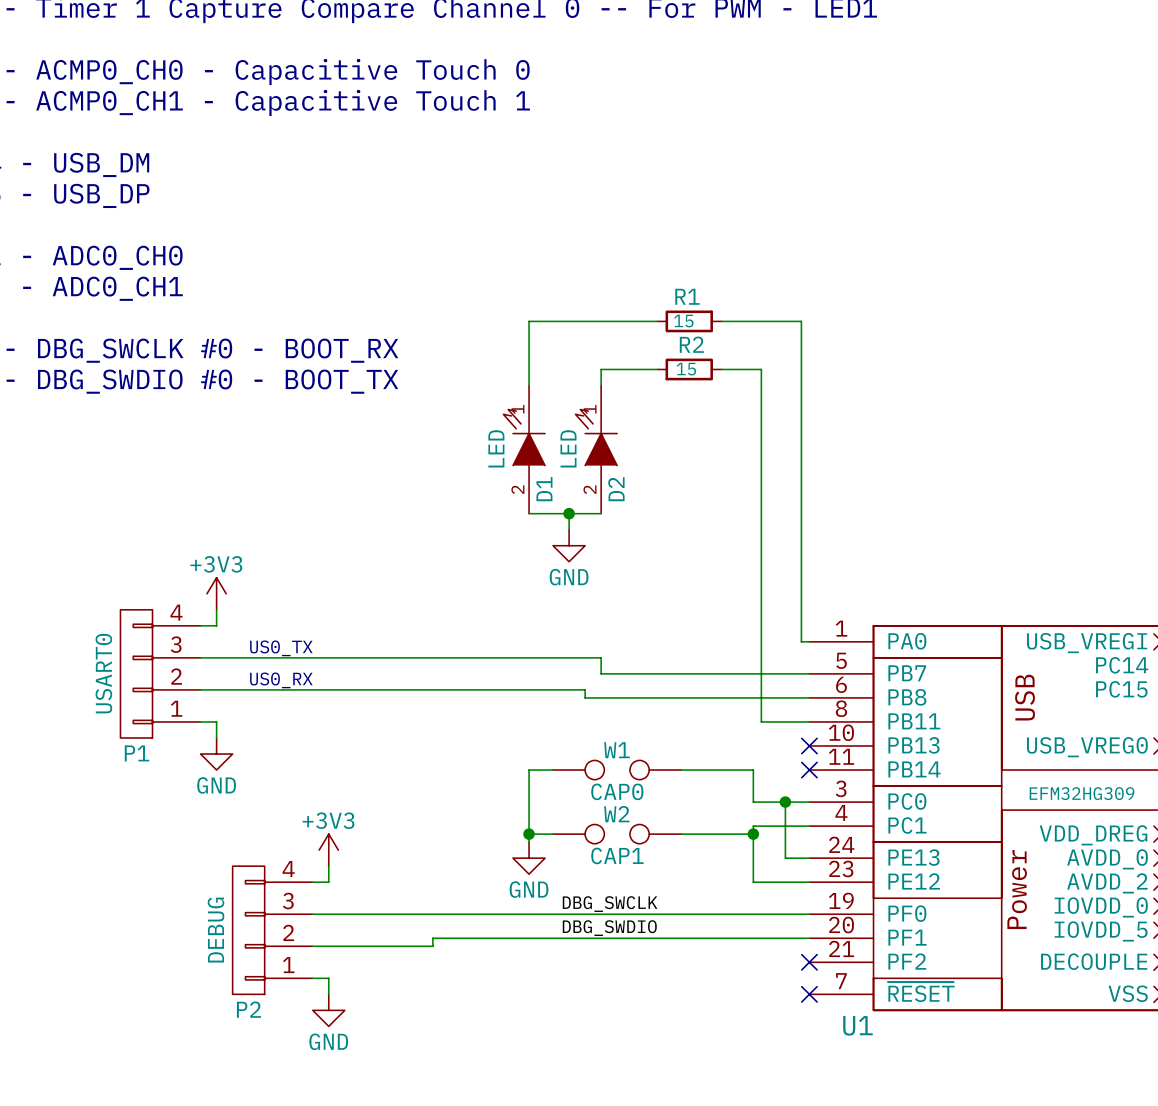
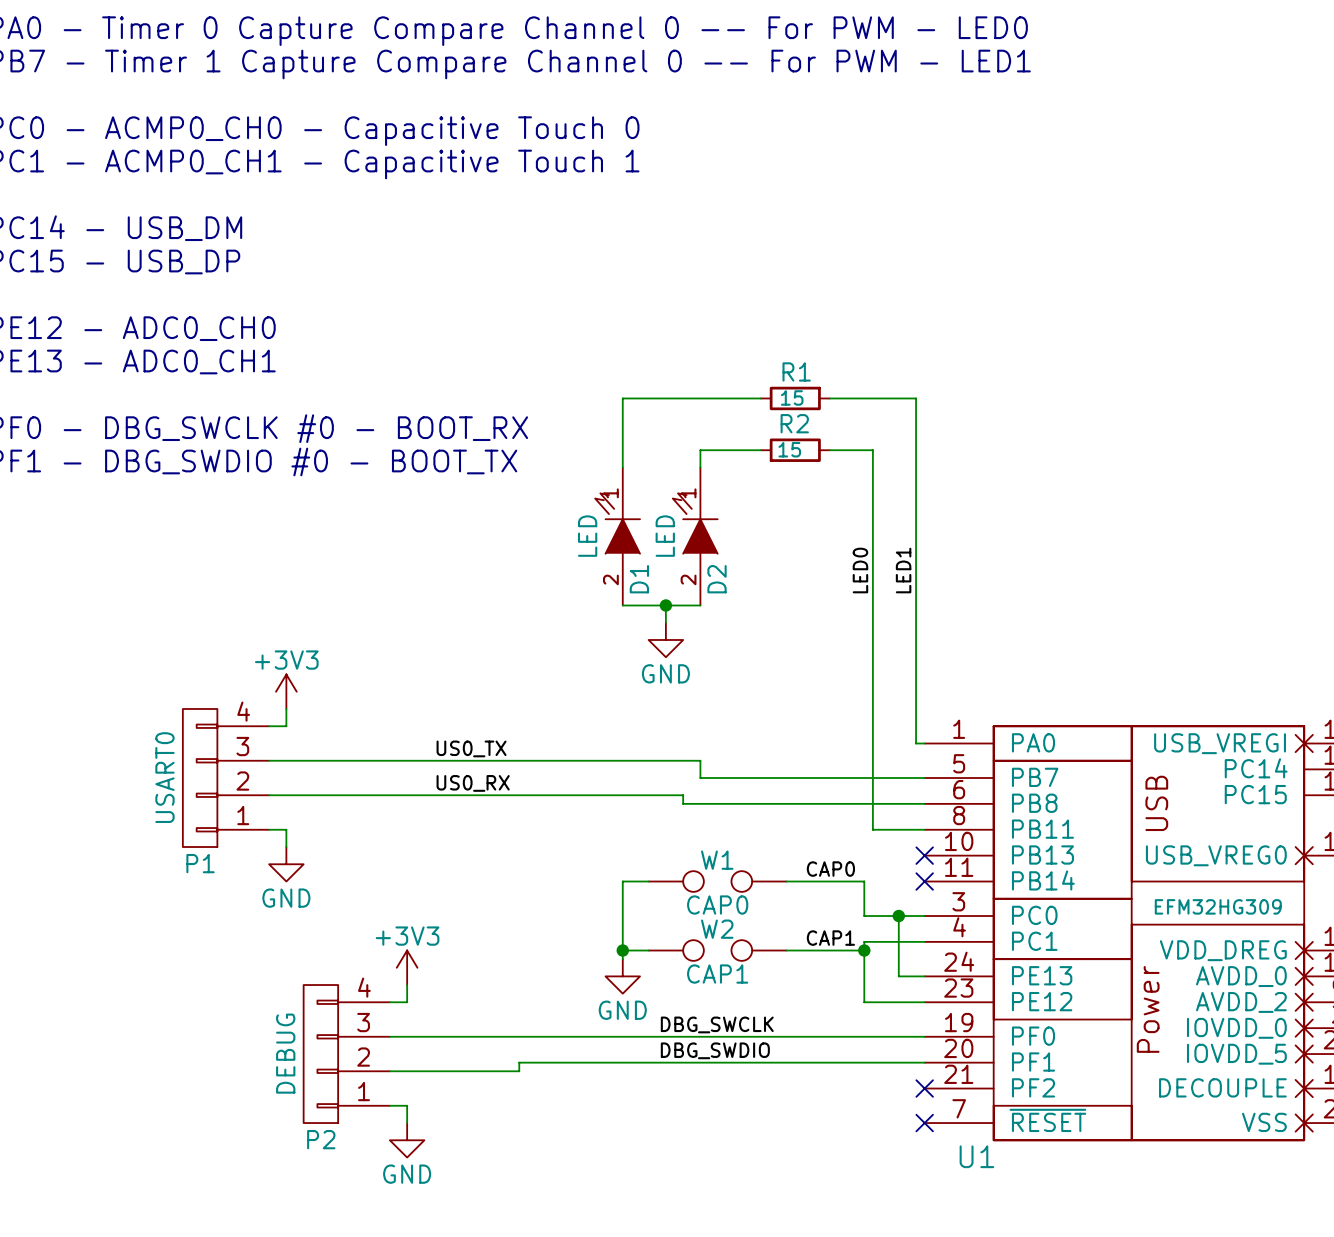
label: none -> LED0 (860, 570)
label: none -> LED1 (903, 570)
label: none -> US0_TX (471, 748)
text: US0_TX (281, 648) -> none
label: none -> US0_RX (473, 783)
text: US0_RX (281, 680) -> none
label: none -> CAP0 (830, 869)
label: none -> CAP1 (830, 938)

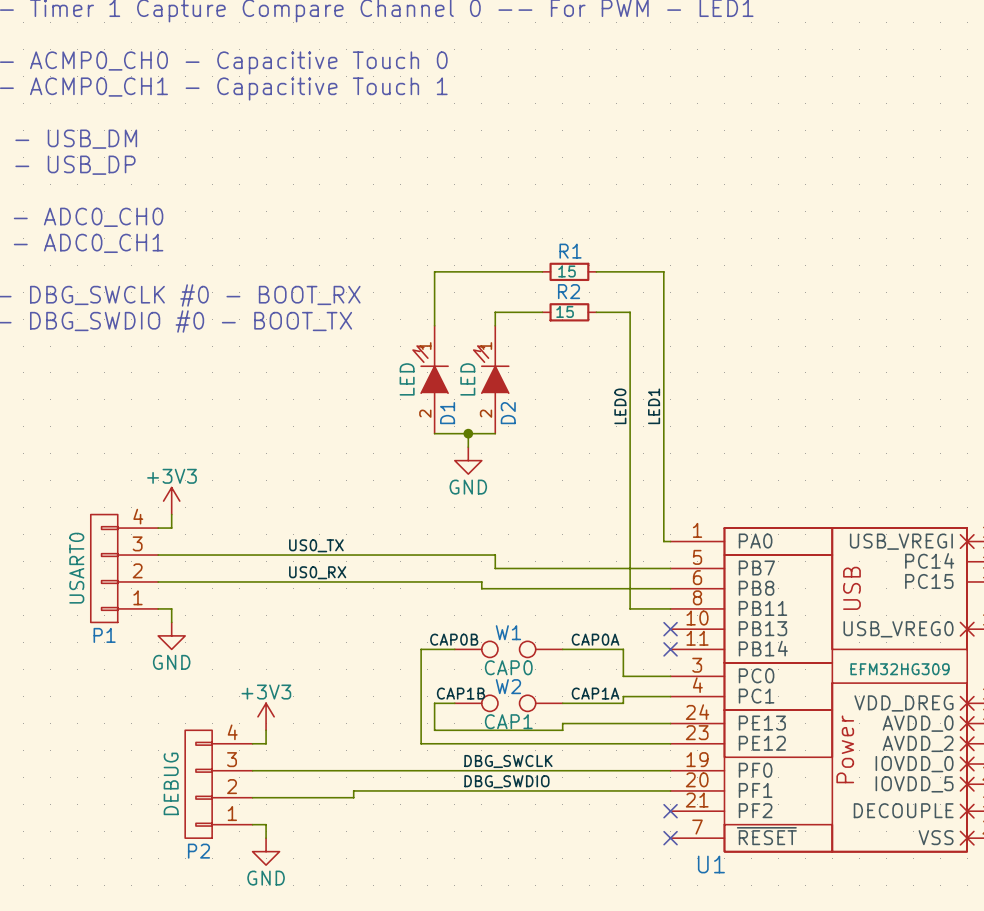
label: none -> CAP0B (454, 639)
label: CAP0 (830, 869) -> CAP0A (595, 639)
wire: (622, 881) (622, 950) -> (434, 649) (421, 649) (421, 743) (623, 743)
wire: (898, 916) (898, 976) -> (434, 710) (434, 730) (562, 730) (562, 723) (650, 723)
junction: (898, 916) -> none
label: none -> CAP1B (460, 693)
label: CAP1 (830, 938) -> CAP1A (595, 693)
junction: (622, 950) -> none
wire: (864, 950) (864, 1002) -> none
junction: (864, 950) -> none
power symbol: GND (622, 976) -> none

